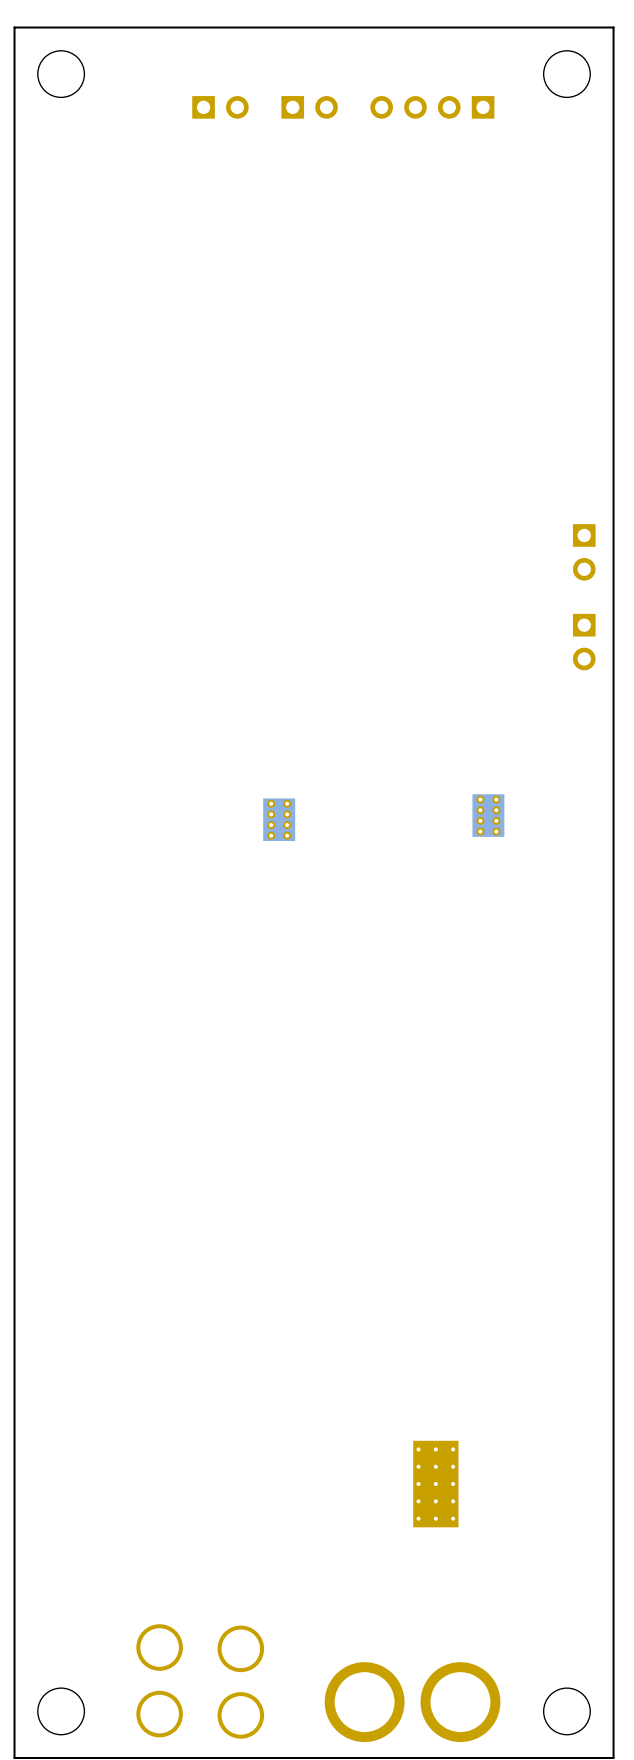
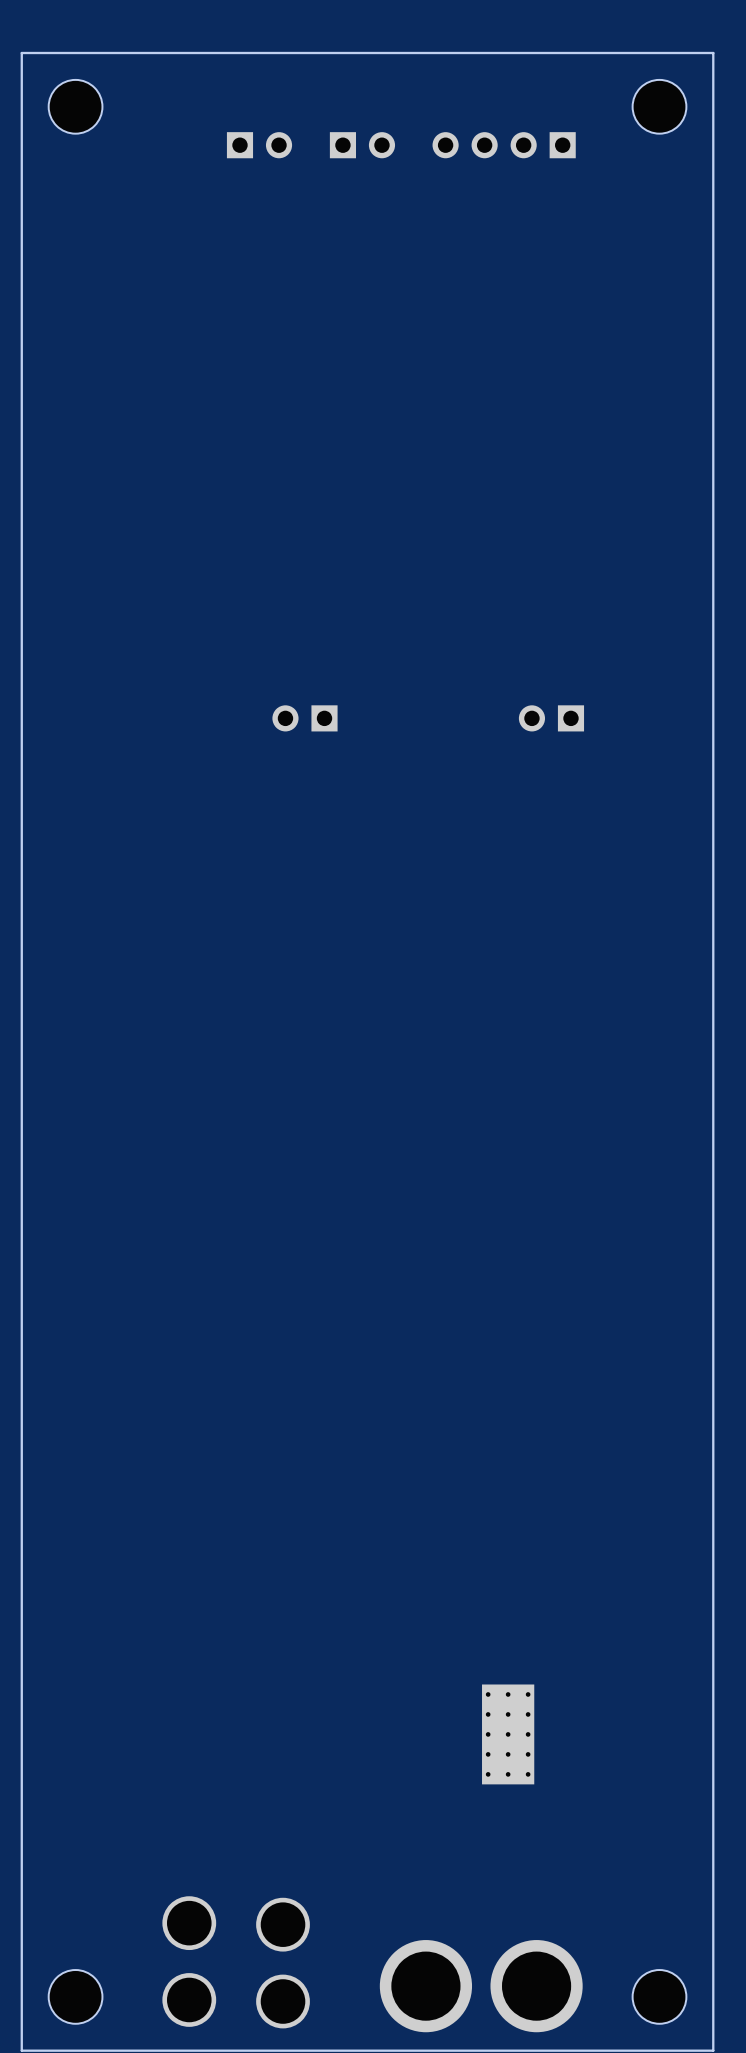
part: (584, 552) -> none
part: none -> (304, 718)
part: none -> (551, 718)
part: (584, 642) -> none
part: (488, 815) -> none
part: (279, 819) -> none

